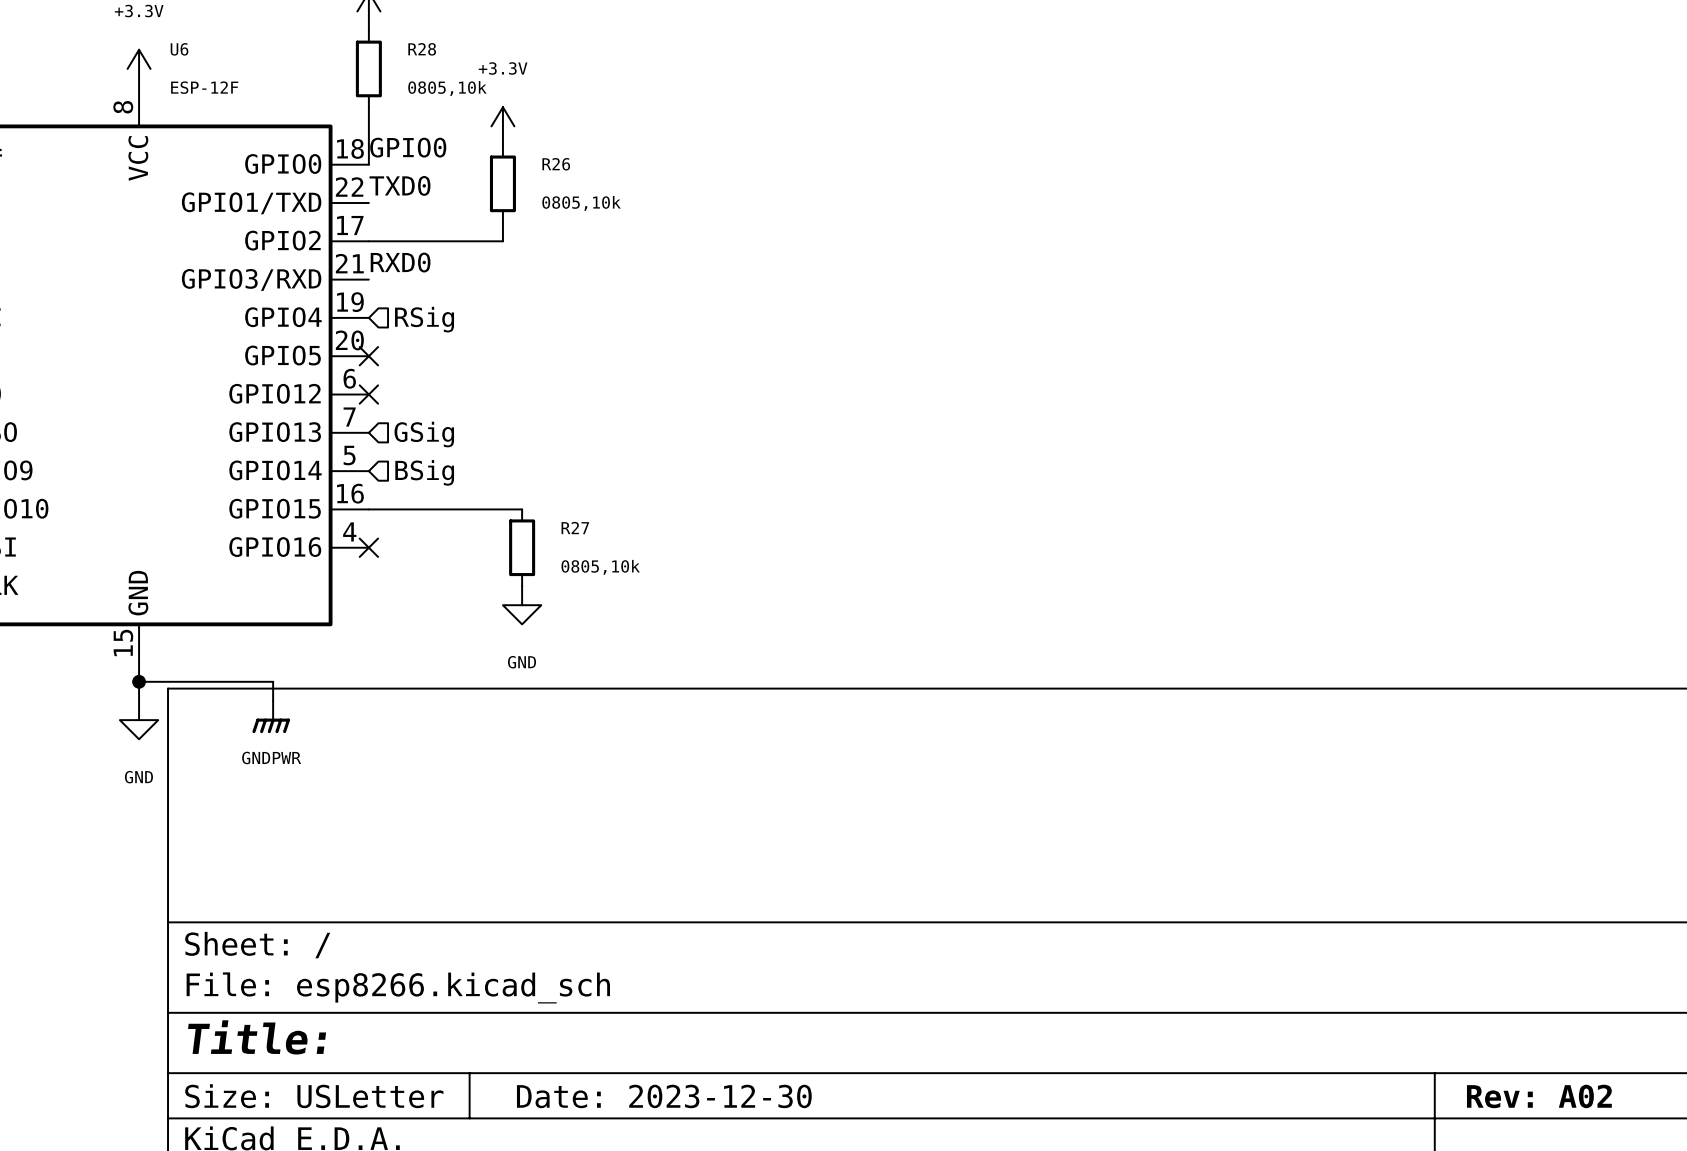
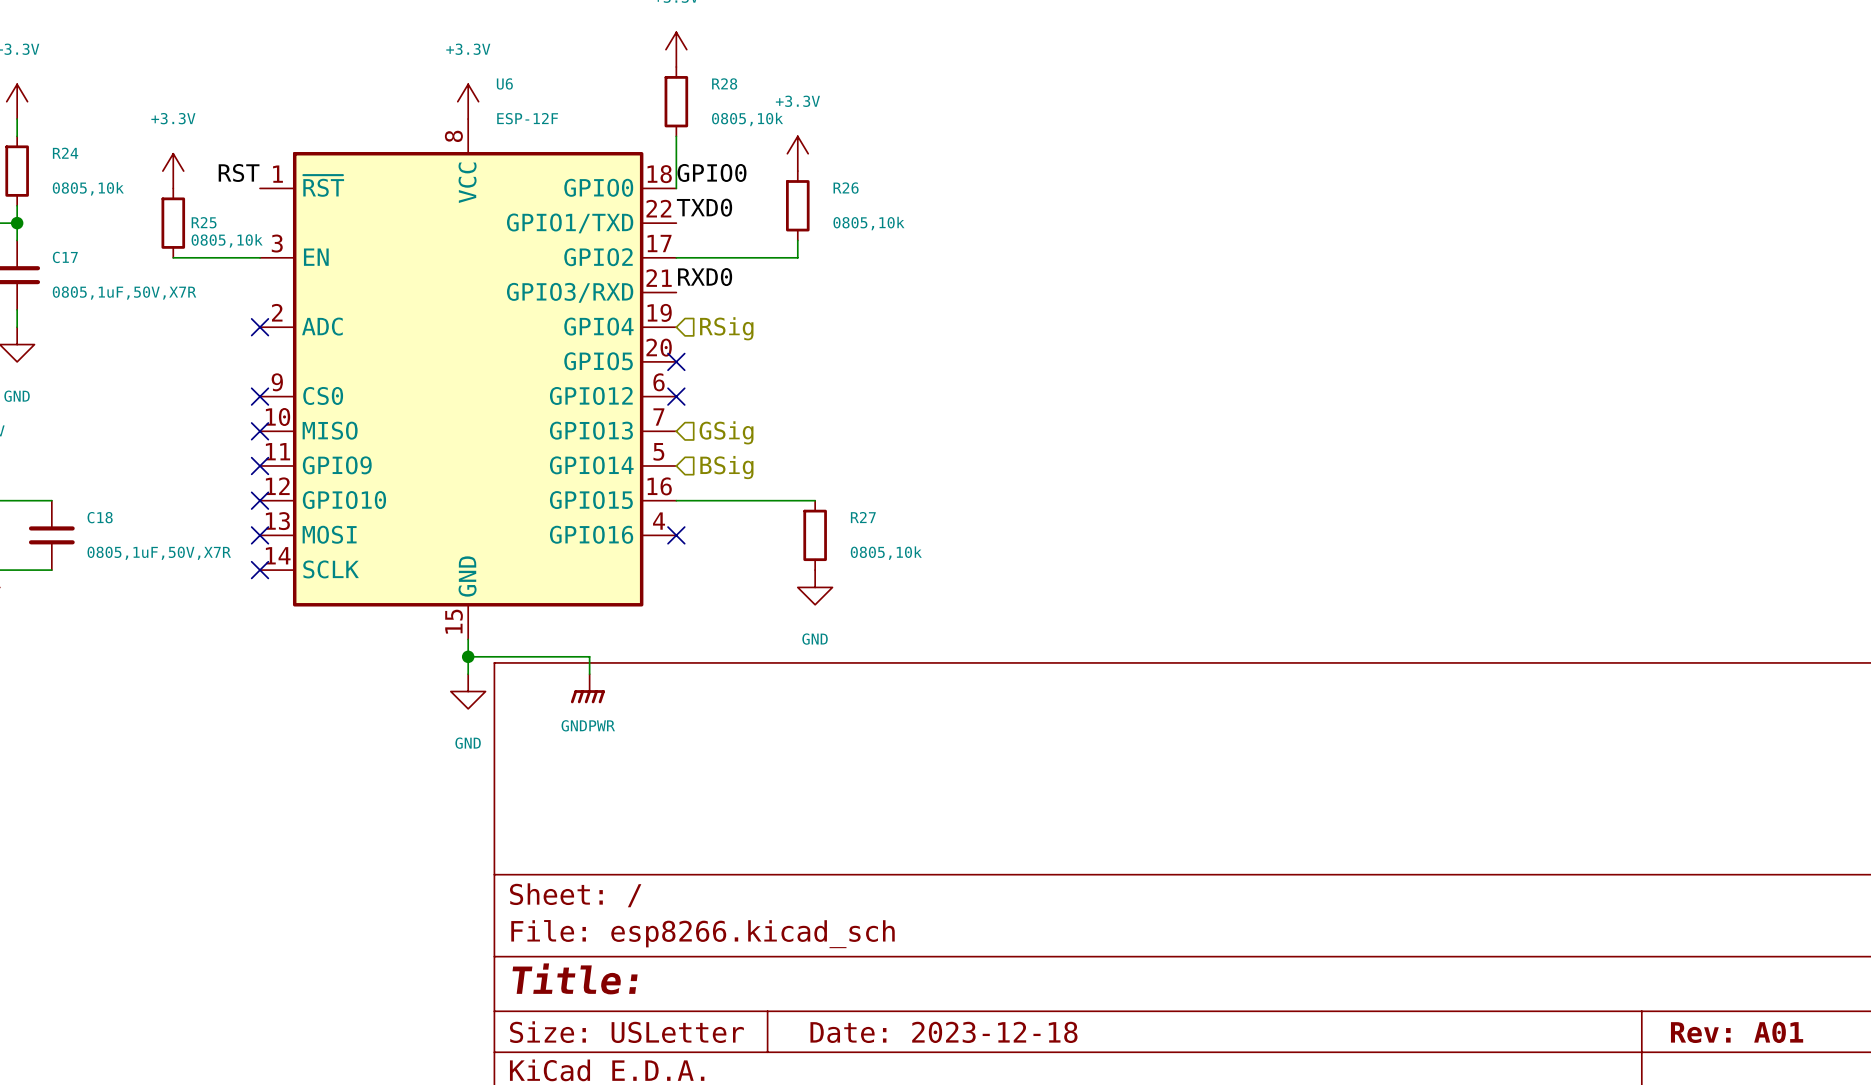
title block: Date: 2023-12-30 (664, 1096) -> Date: 2023-12-18 (943, 1032)
title block: Rev: A02 (1539, 1096) -> Rev: A01 (1737, 1032)

